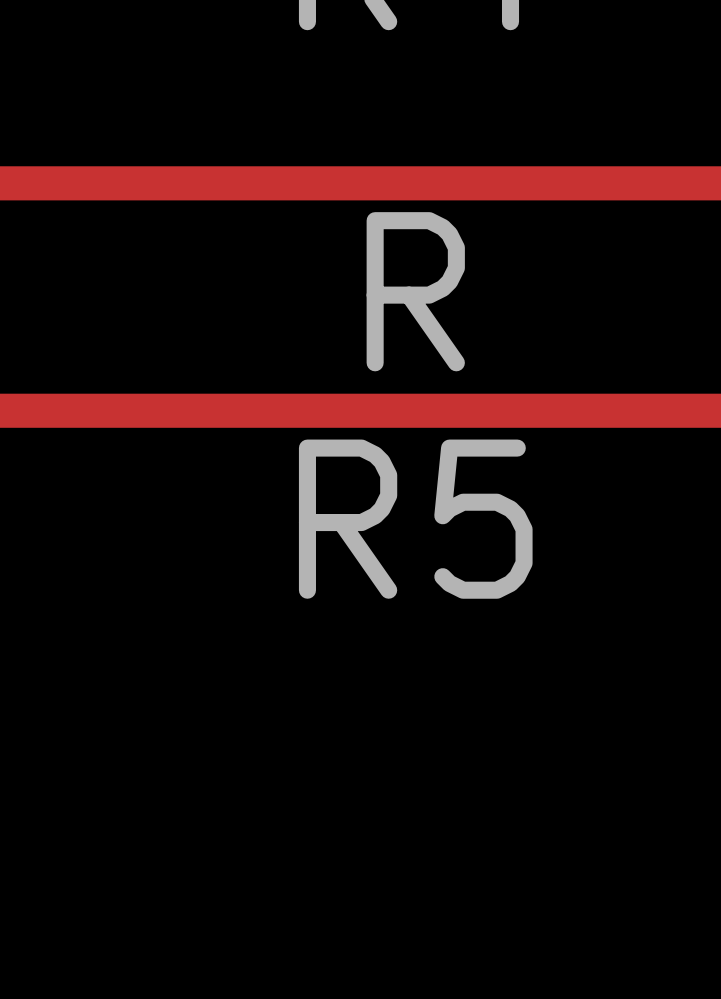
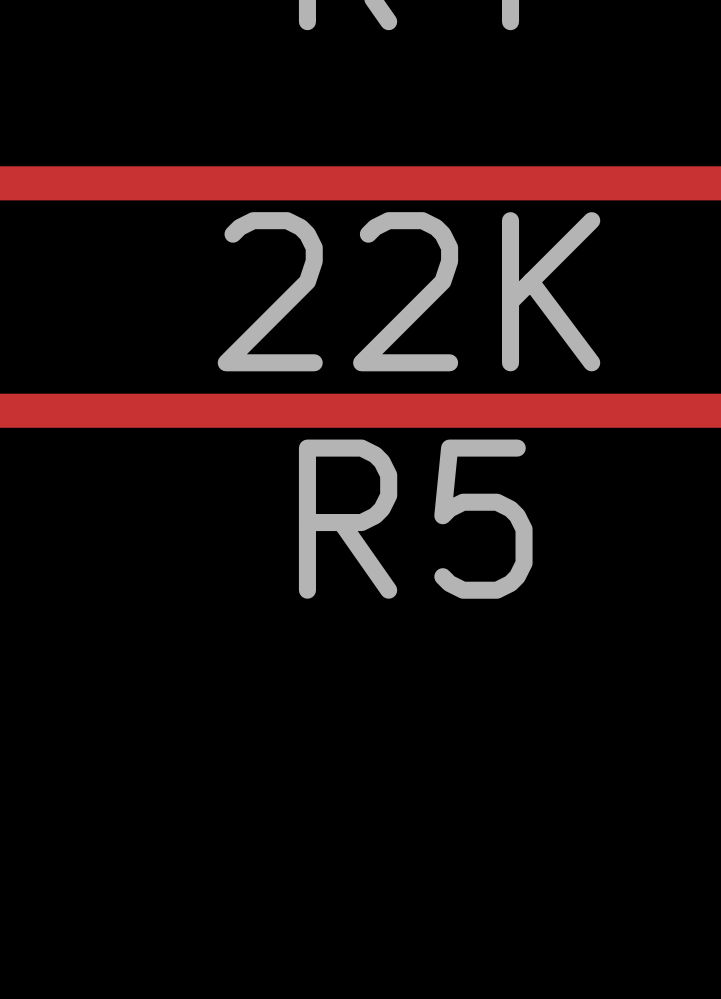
R5 value: R (415, 291) -> 22K (408, 291)

